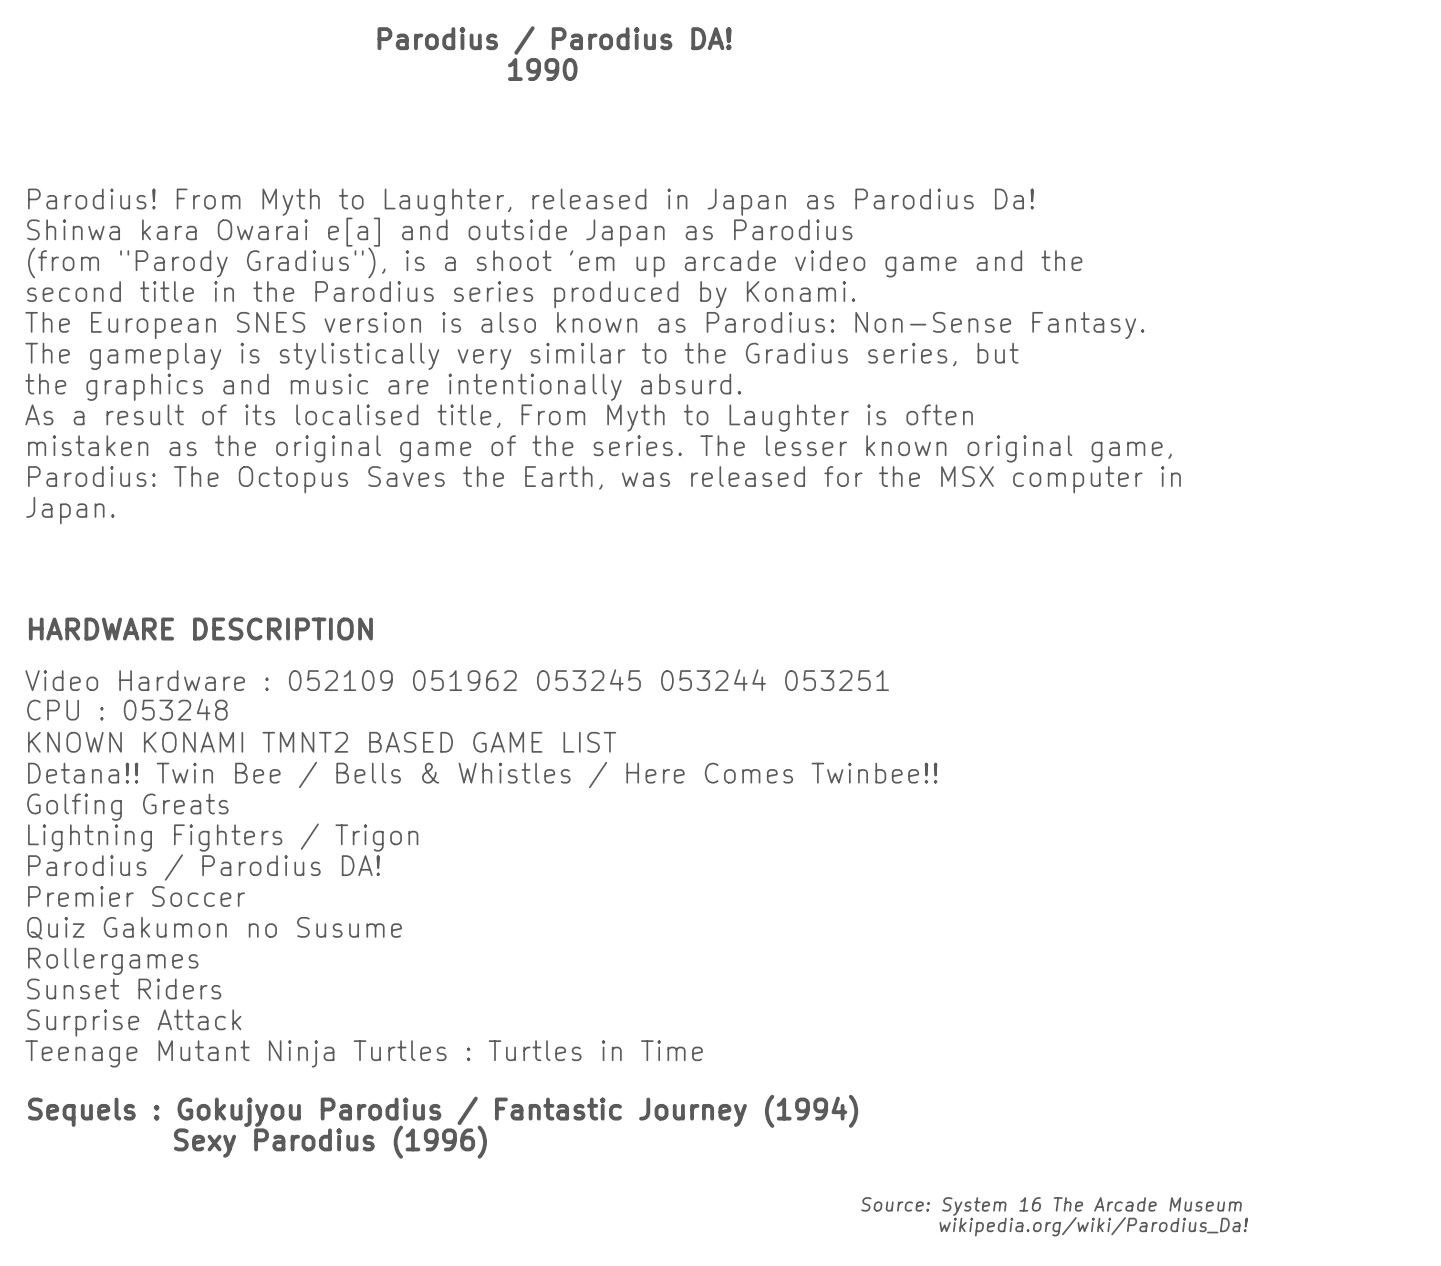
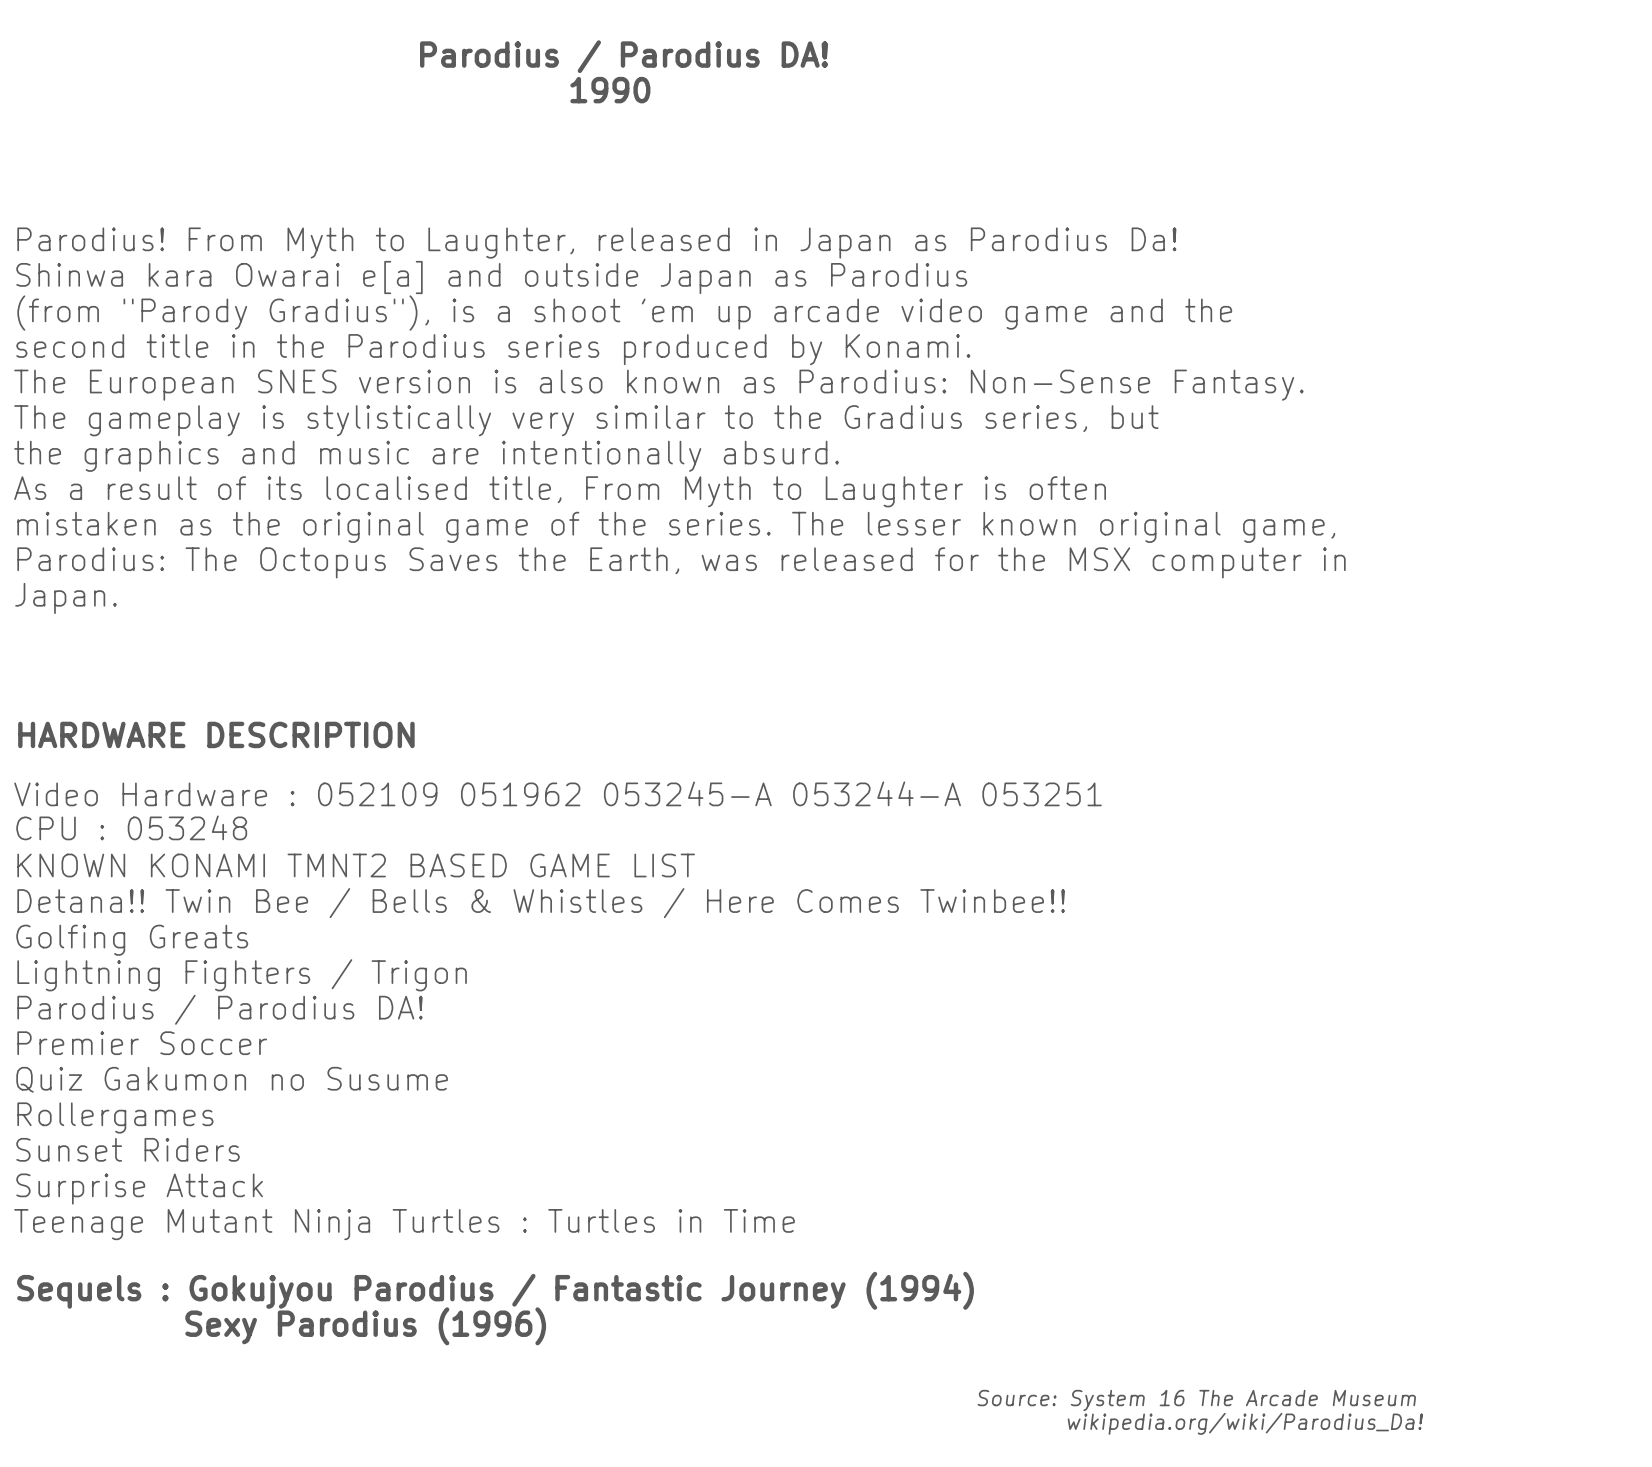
text: Video Hardware : 052109 051962 053245 053244 053251 (457, 680) -> Video Hardware : 052109 051962 053245-A 053244-A 053251 (557, 793)

